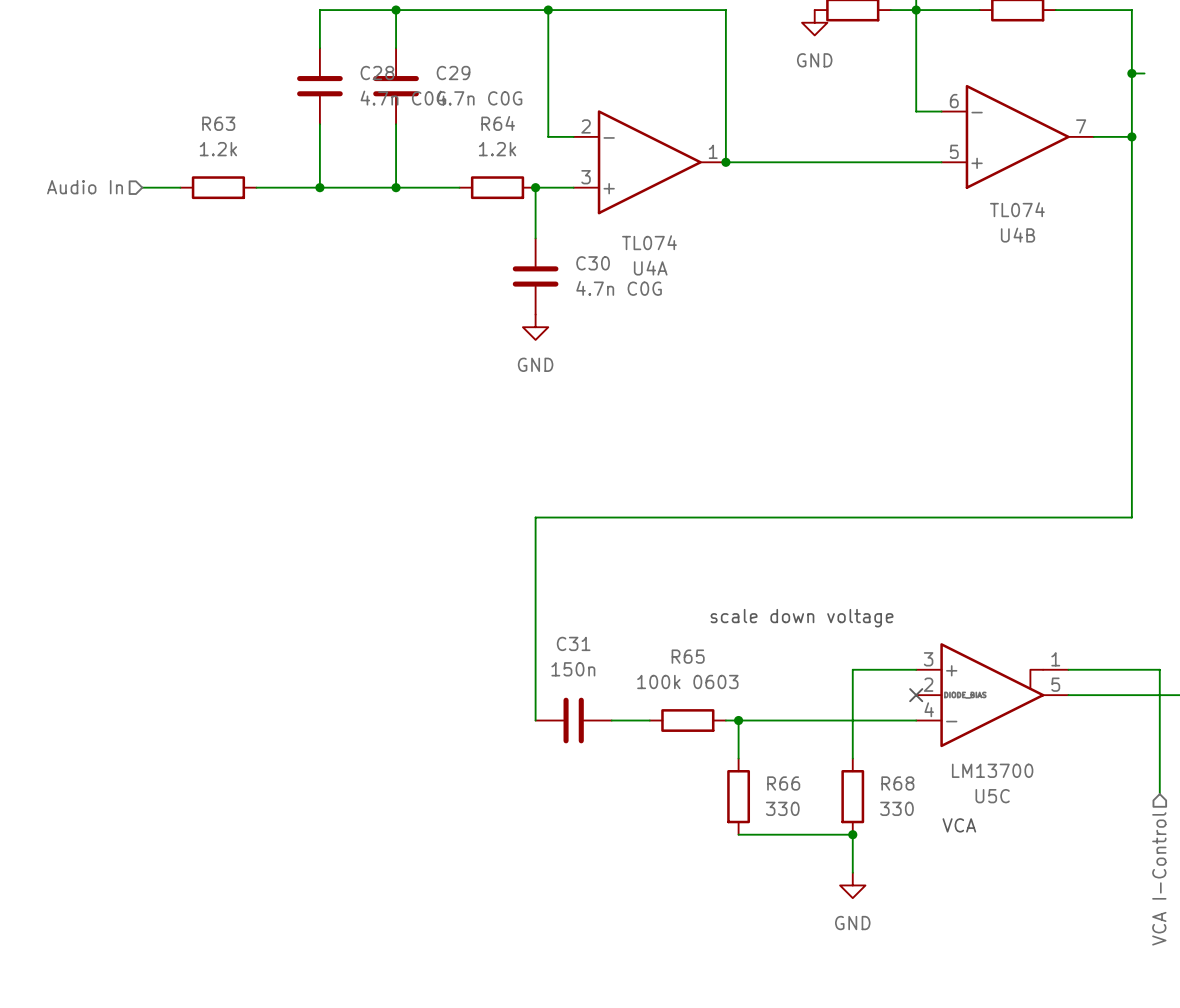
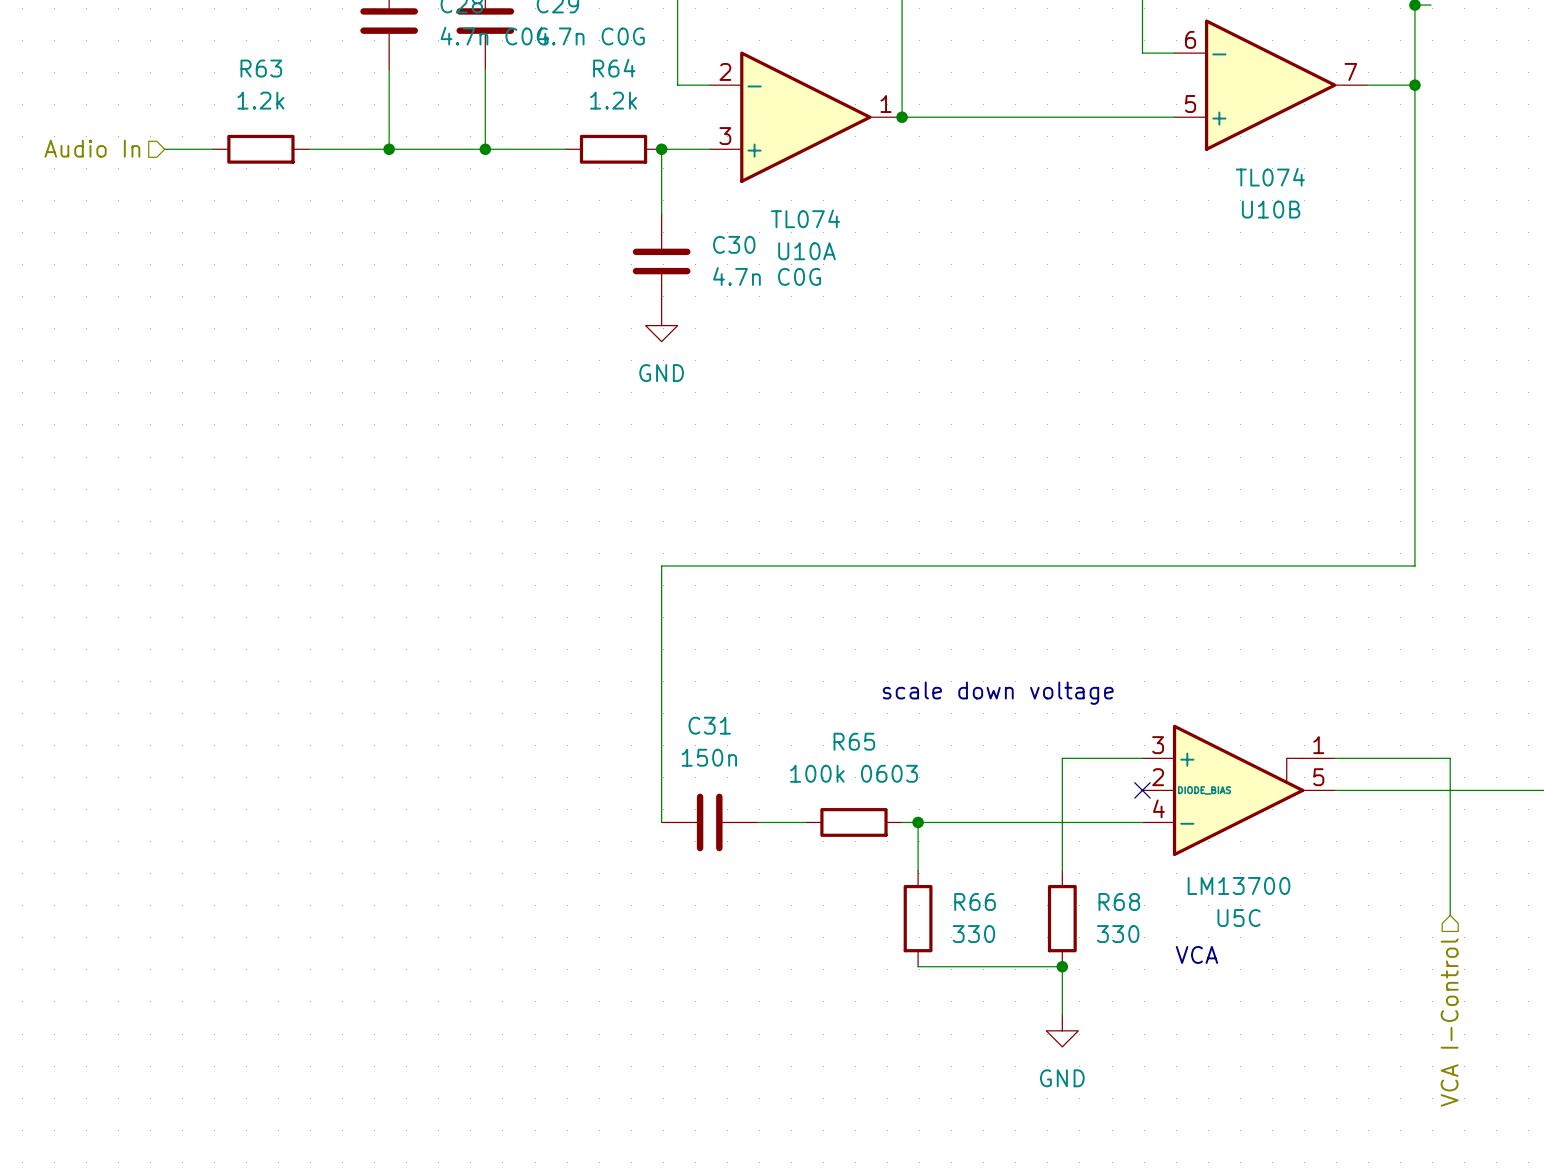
U4B name: U4B (1018, 235) -> U10B (1271, 209)
U4A name: U4A (650, 268) -> U10A (807, 251)

